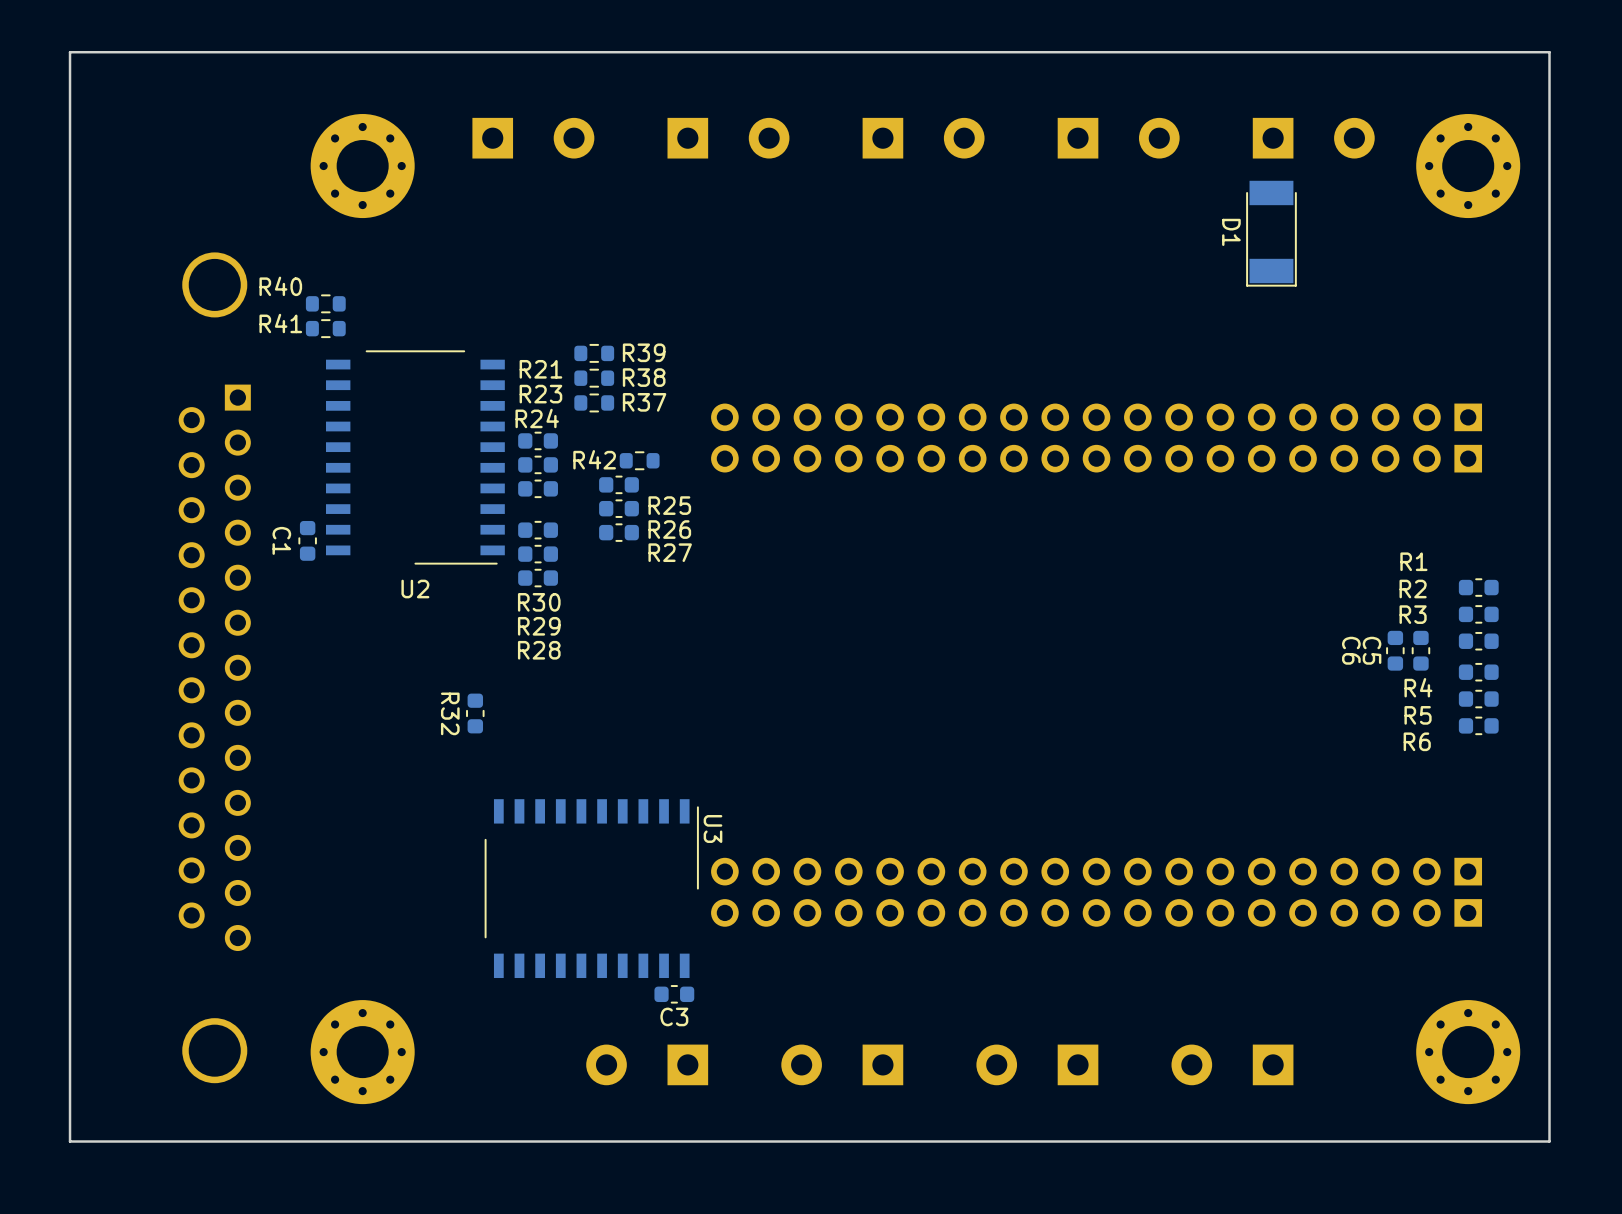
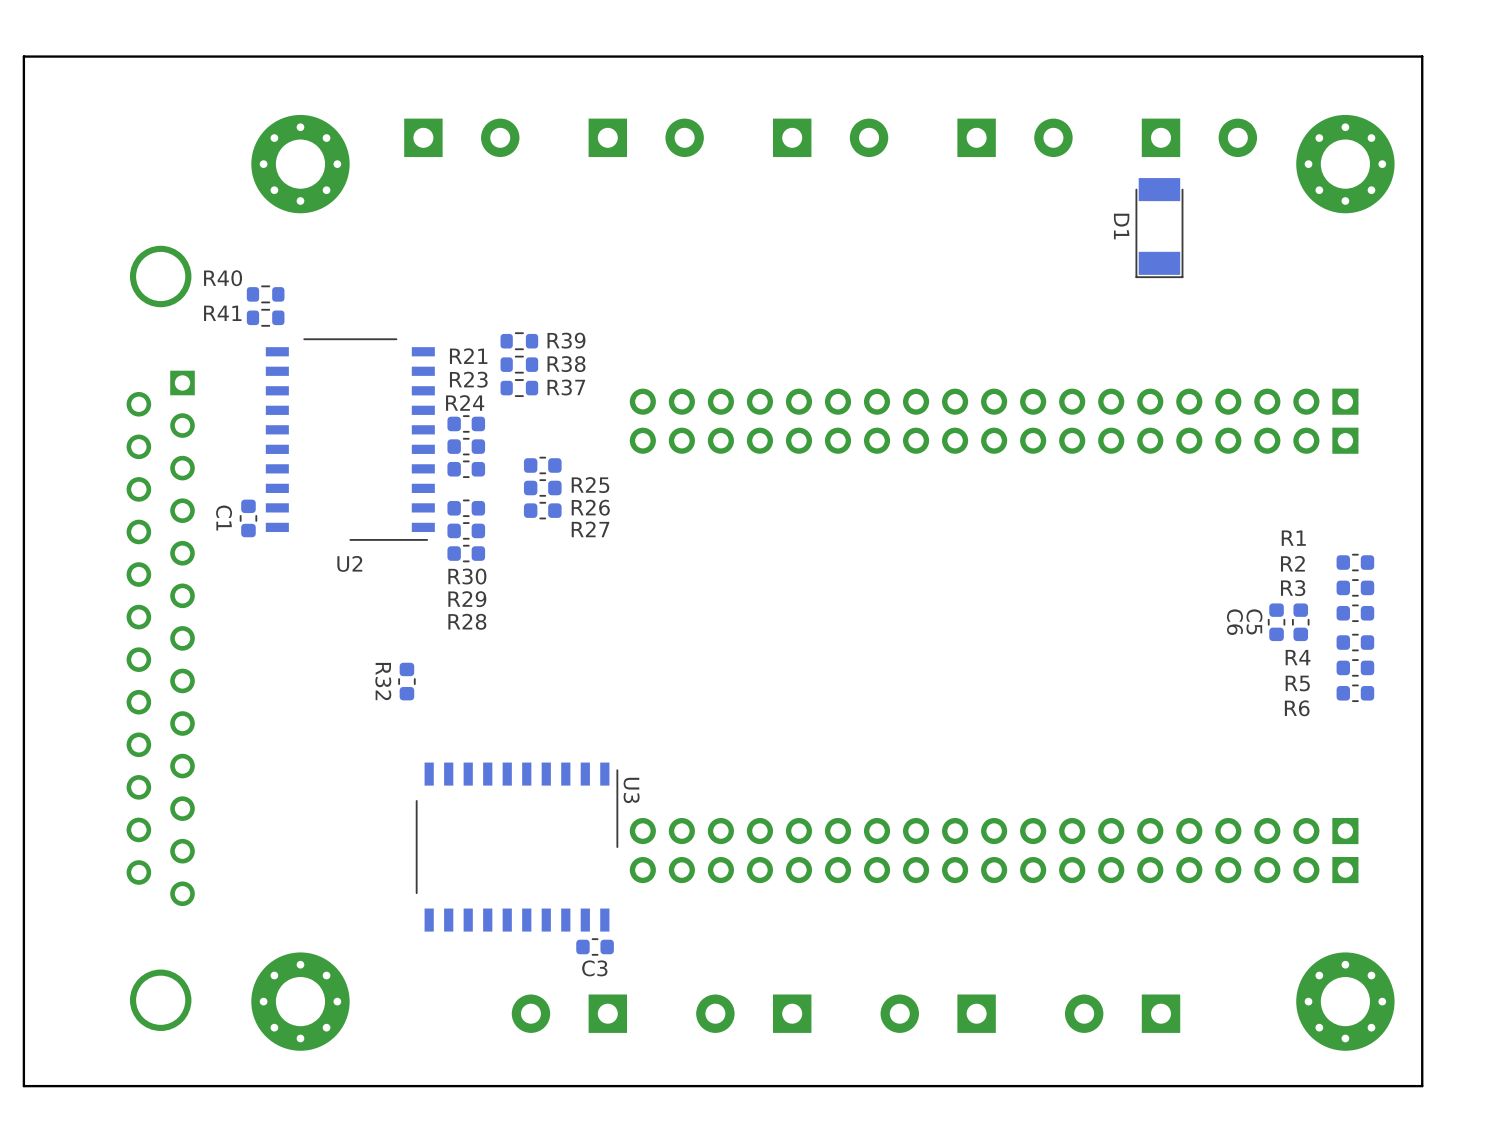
R42: (639, 460) -> none

